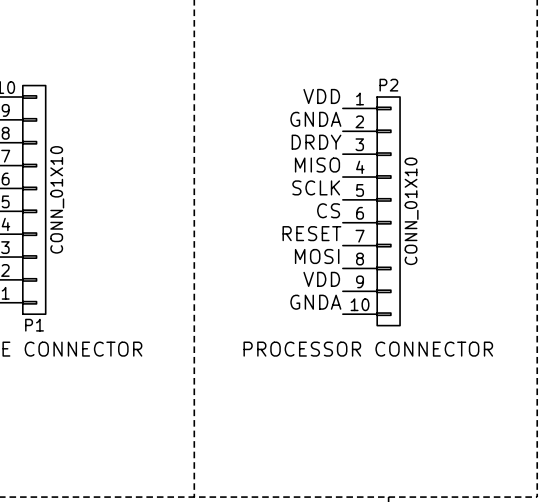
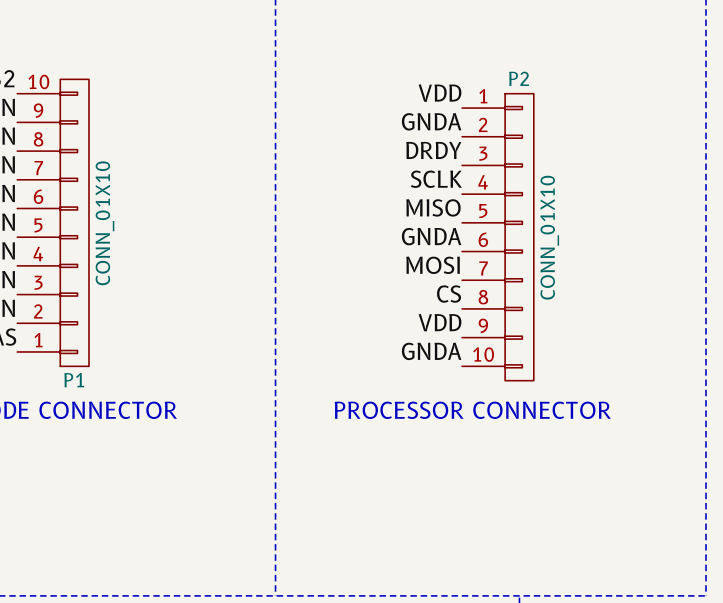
label: MISO (317, 165) -> SCLK (436, 179)
label: SCLK (316, 187) -> MISO (433, 207)
label: CS (328, 210) -> GNDA (431, 236)
label: RESET (311, 233) -> MOSI (433, 265)
label: MOSI (317, 256) -> CS (449, 294)

